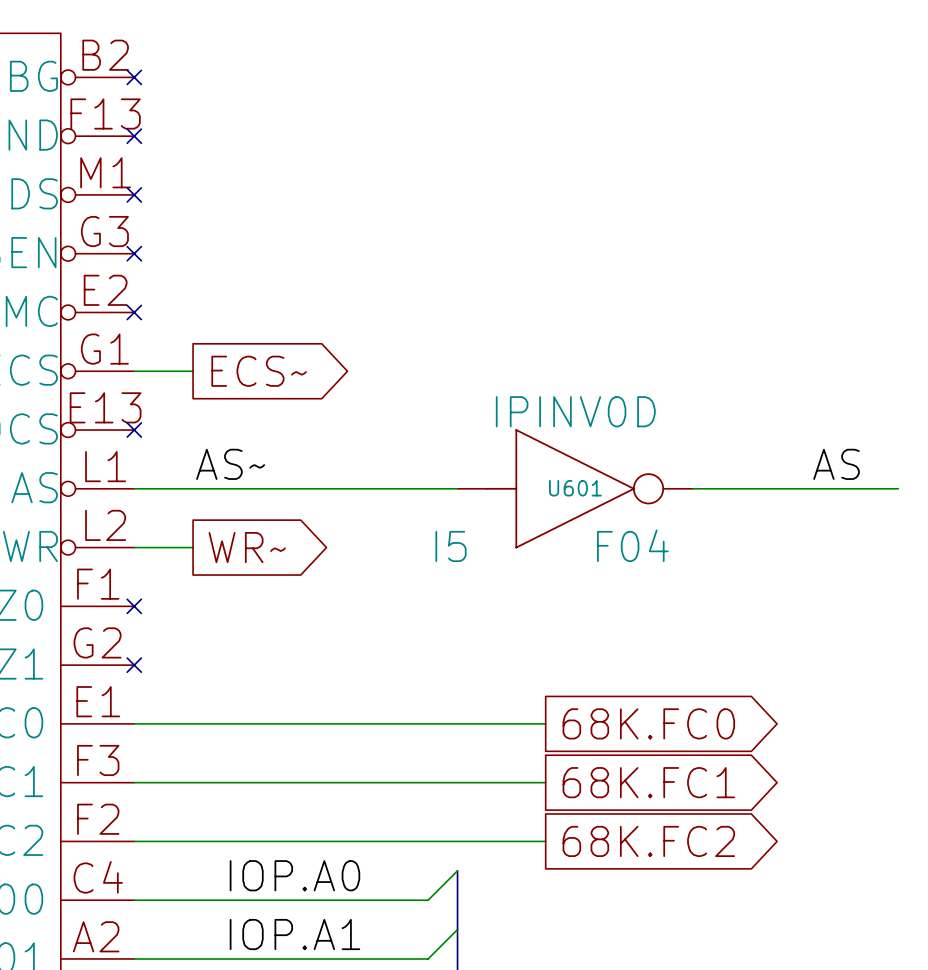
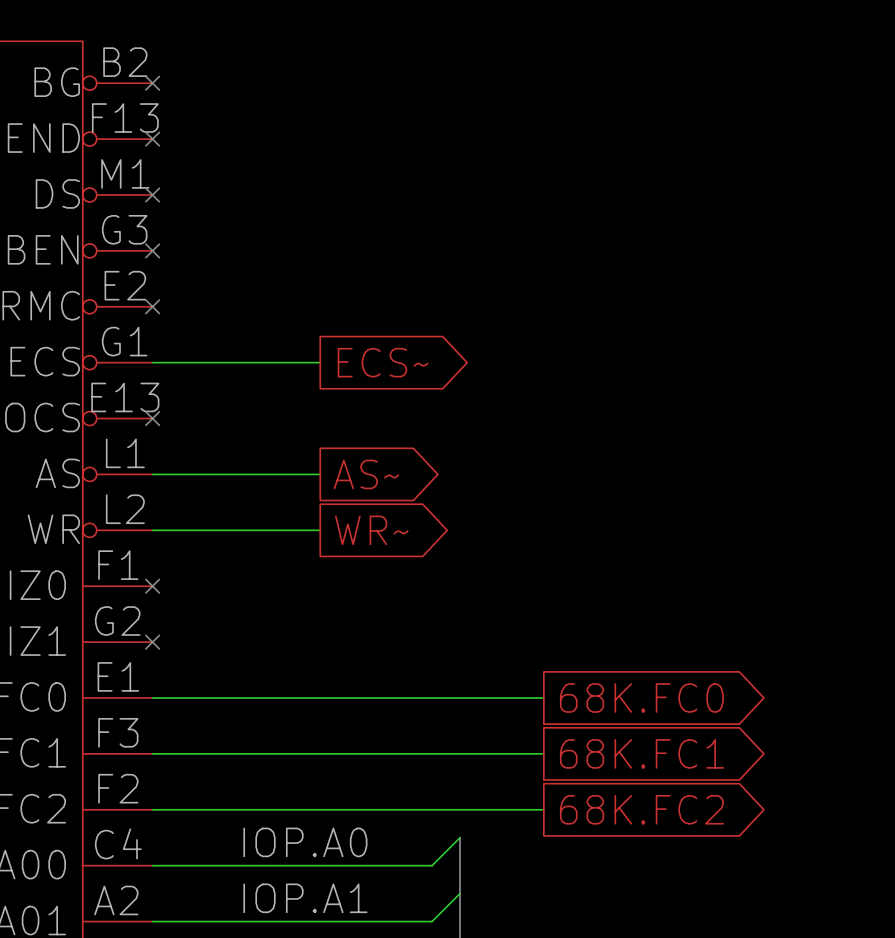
wire: none -> (208, 362) (320, 362)
global label position: ECS~ (259, 371) -> ECS~ (383, 362)
label: AS~ (230, 464) -> none
label: AS (836, 464) -> none
wire: (310, 488) (457, 488) -> none
global label: none -> AS~ (366, 474)
U601: F04 (575, 488) -> none
wire: (692, 488) (898, 488) -> none
wire: none -> (208, 530) (320, 530)
global label position: WR~ (247, 547) -> WR~ (371, 530)

